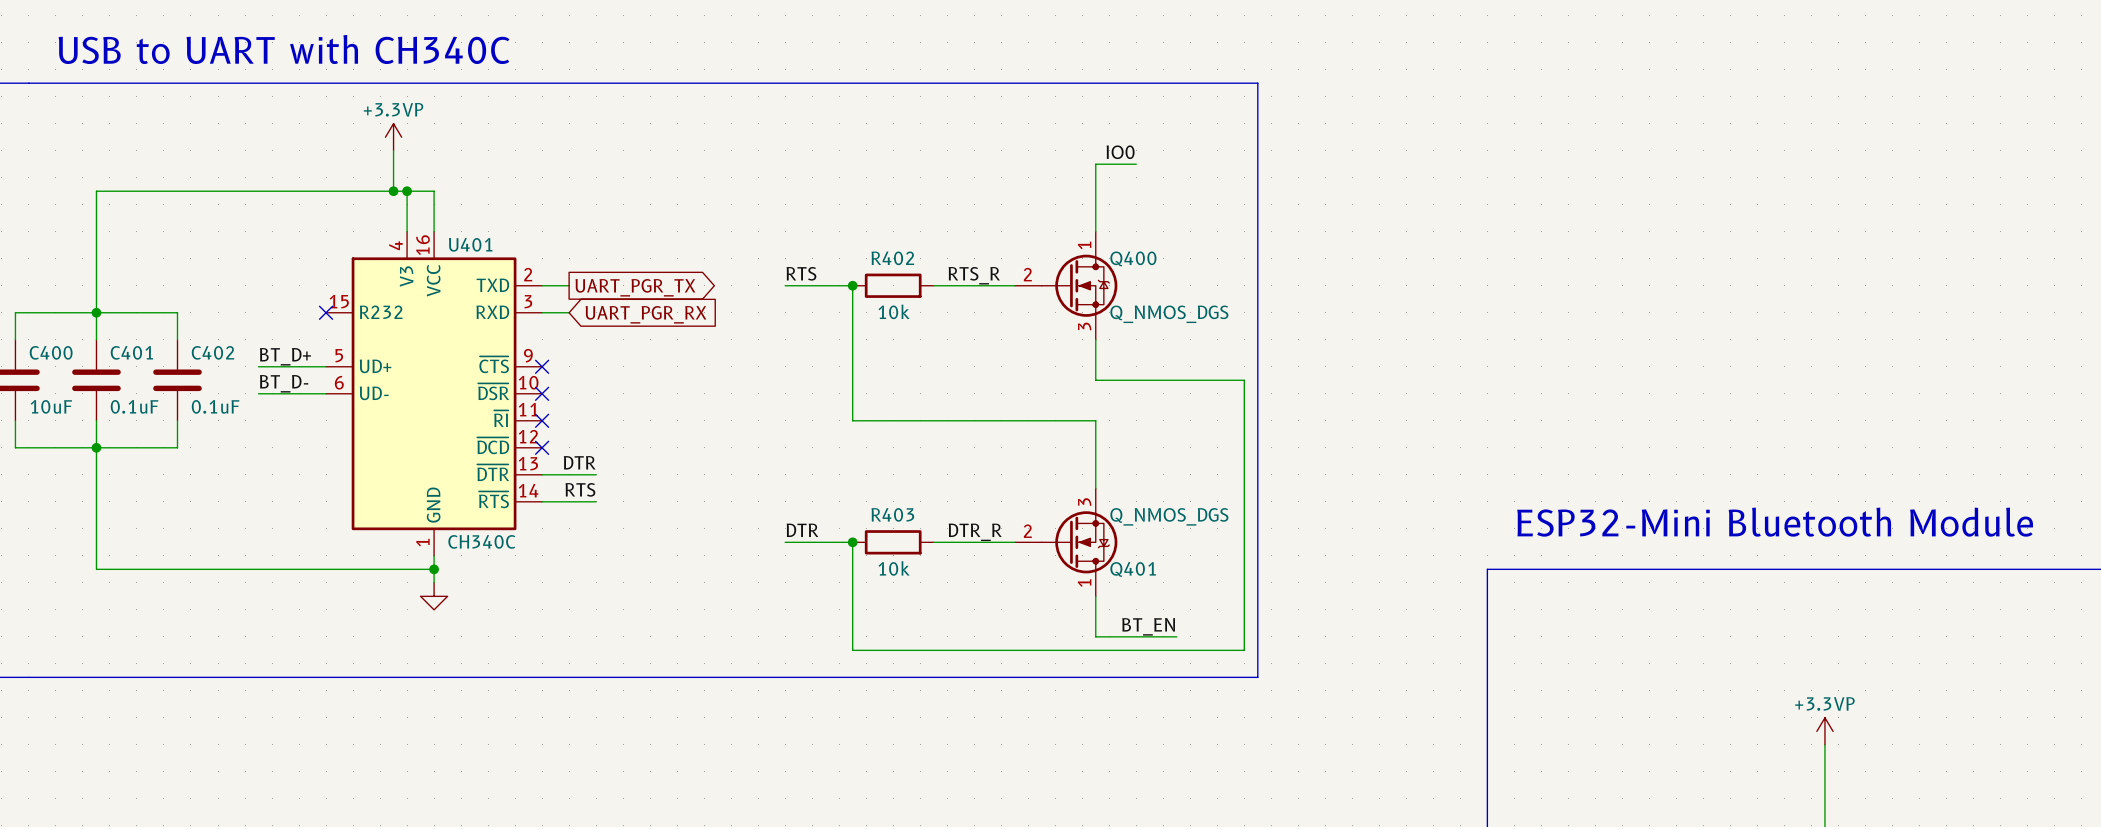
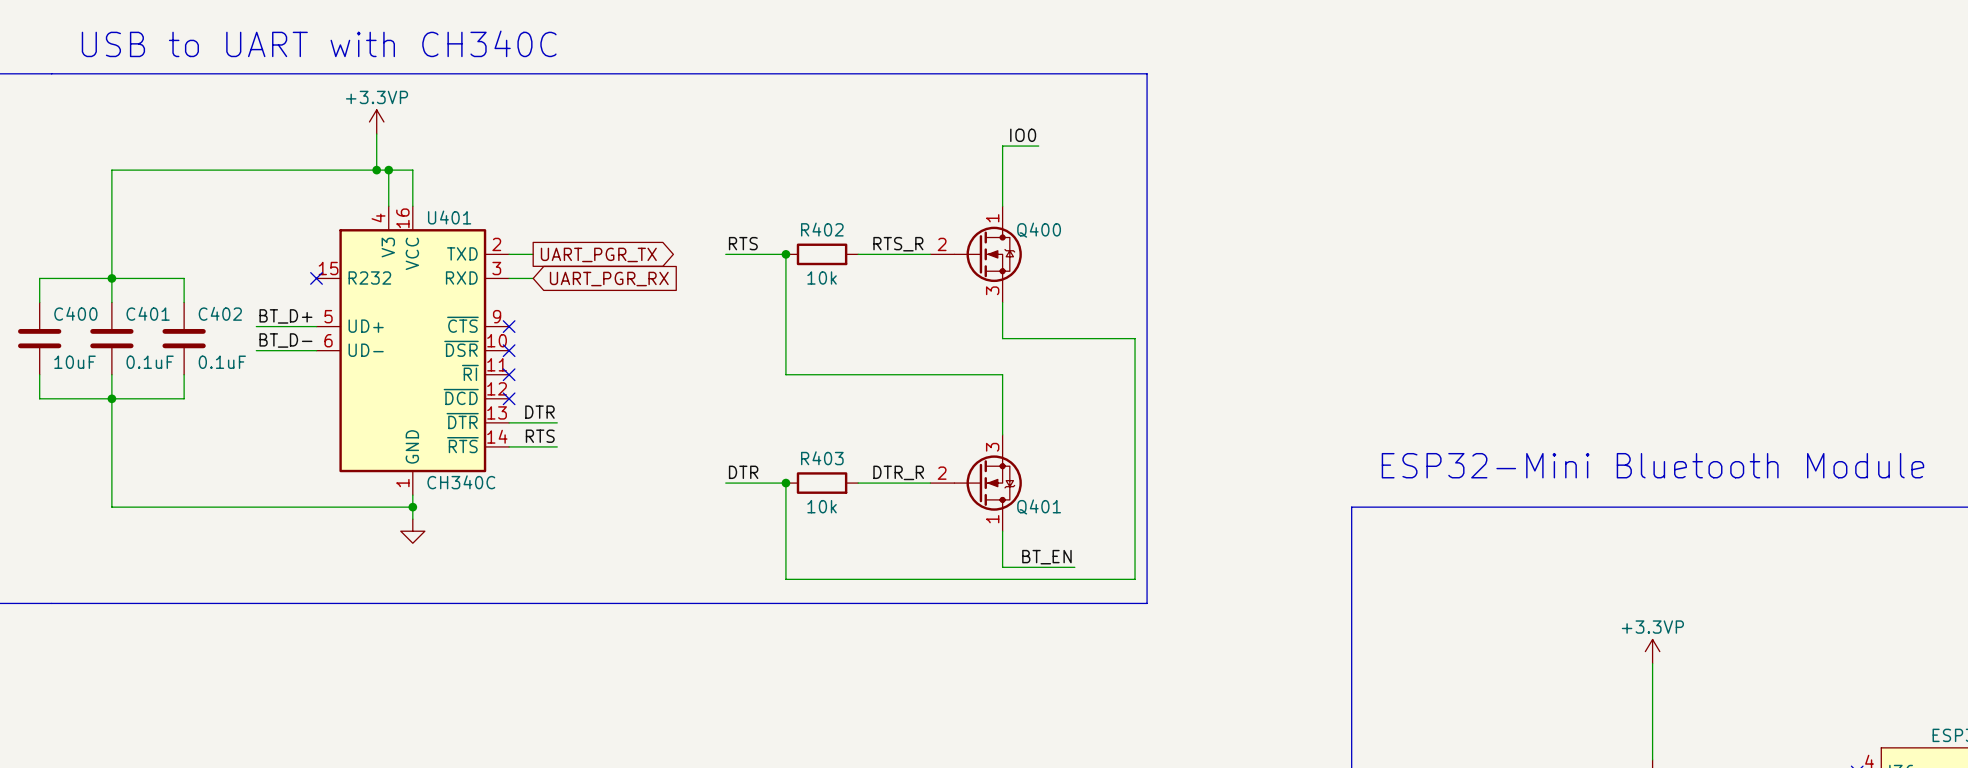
Q400 value: Q_NMOS_DGS (1169, 314) -> none
Q401 value: Q_NMOS_DGS (1169, 516) -> none

